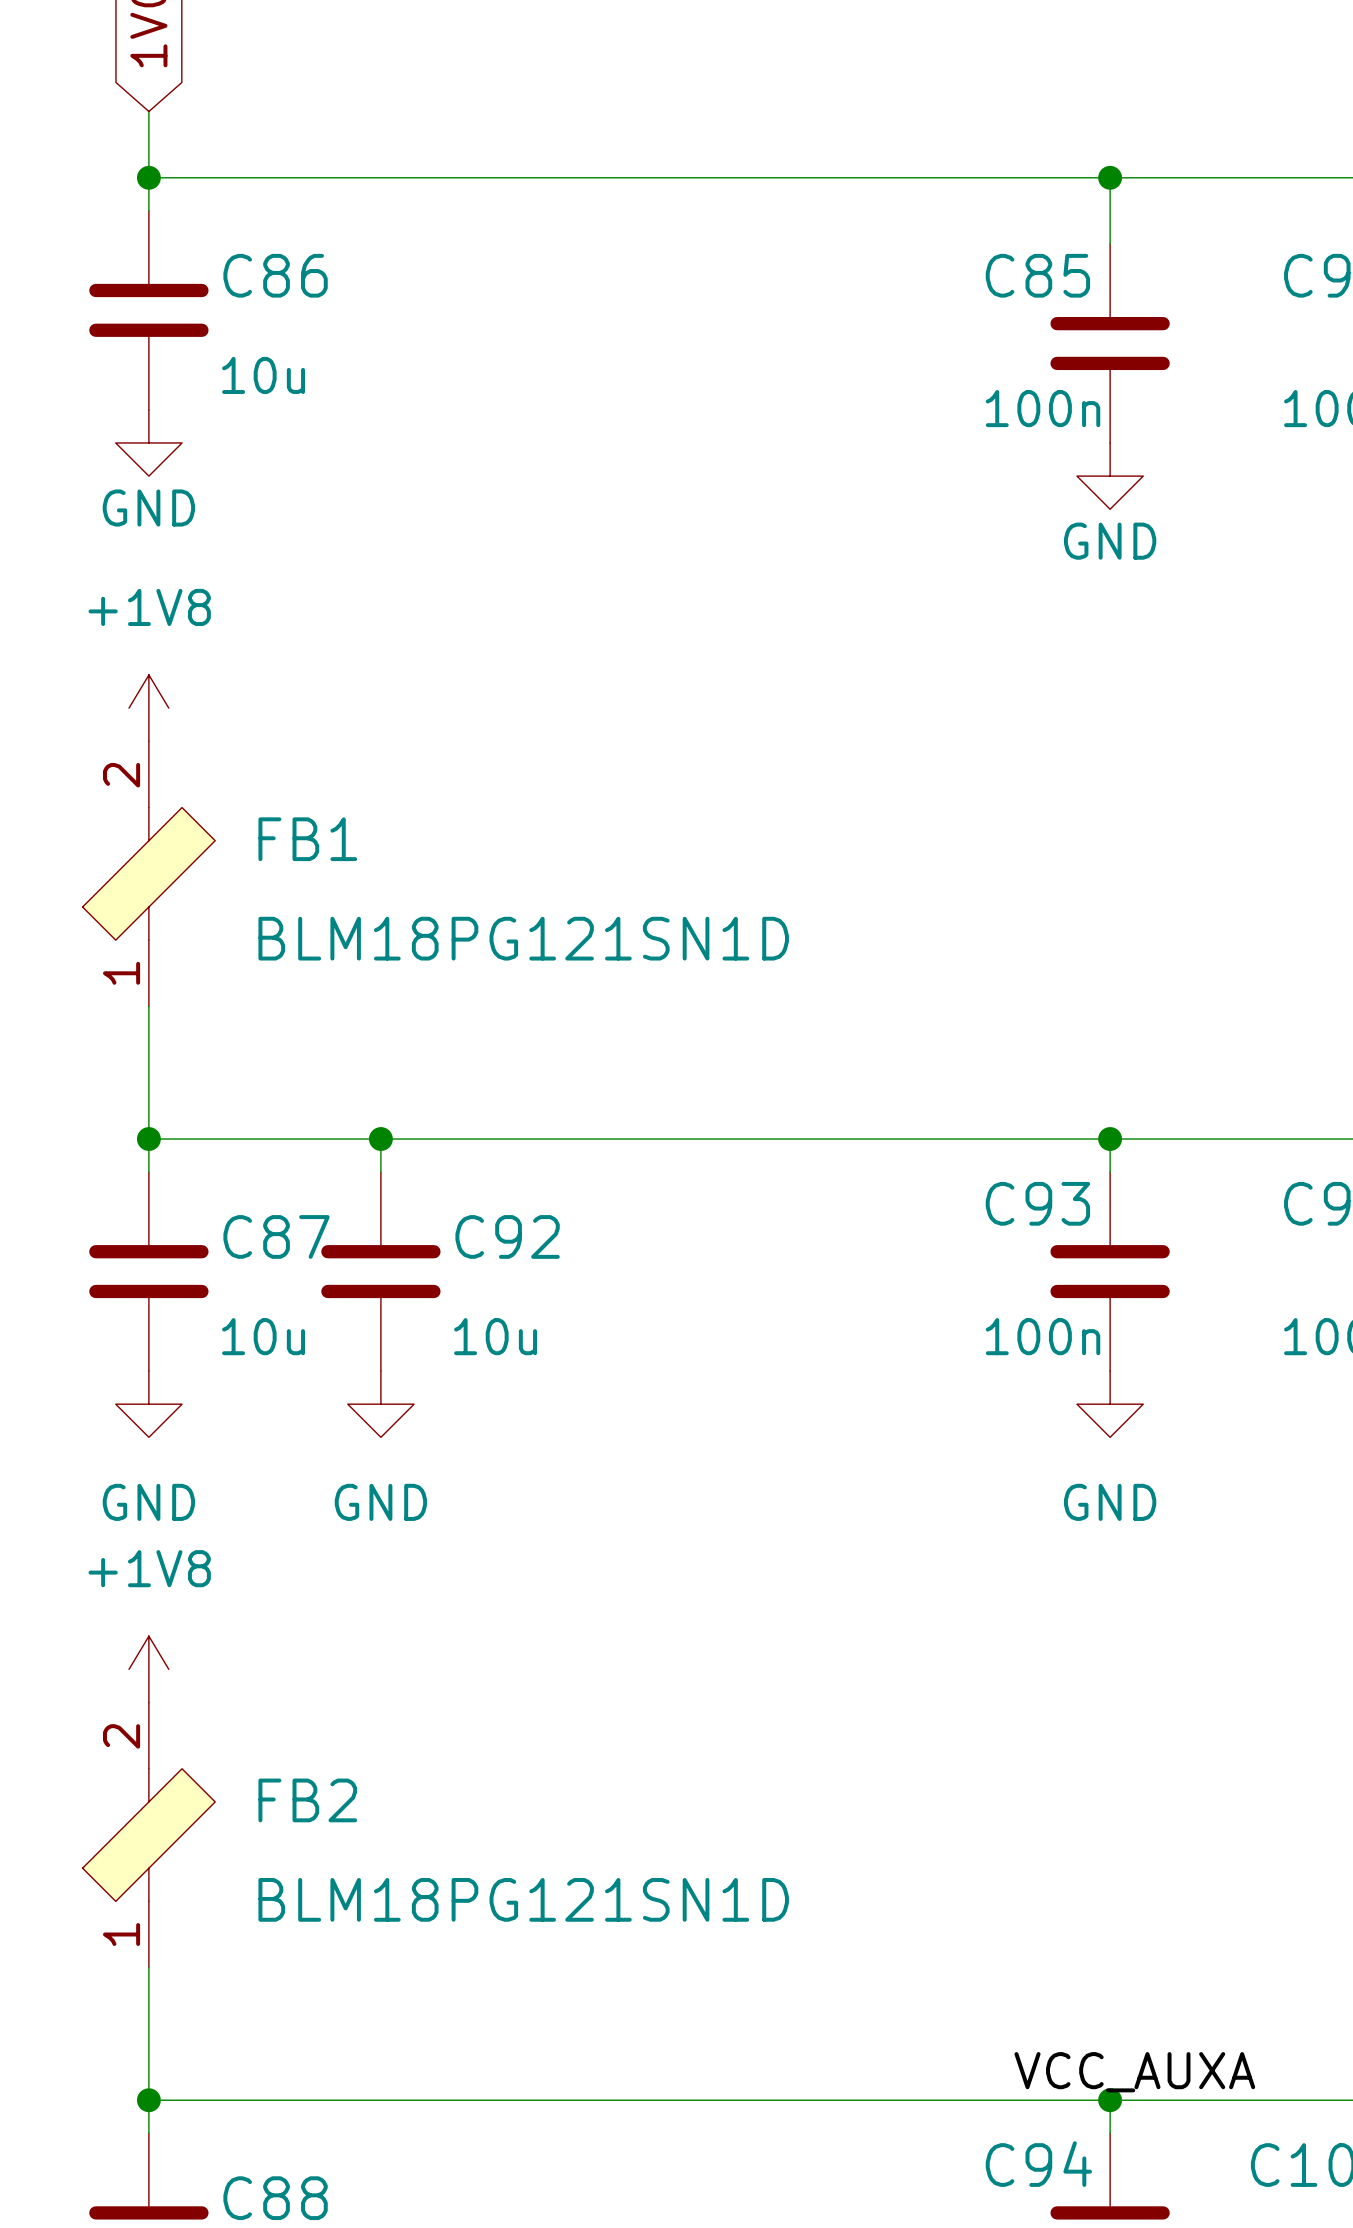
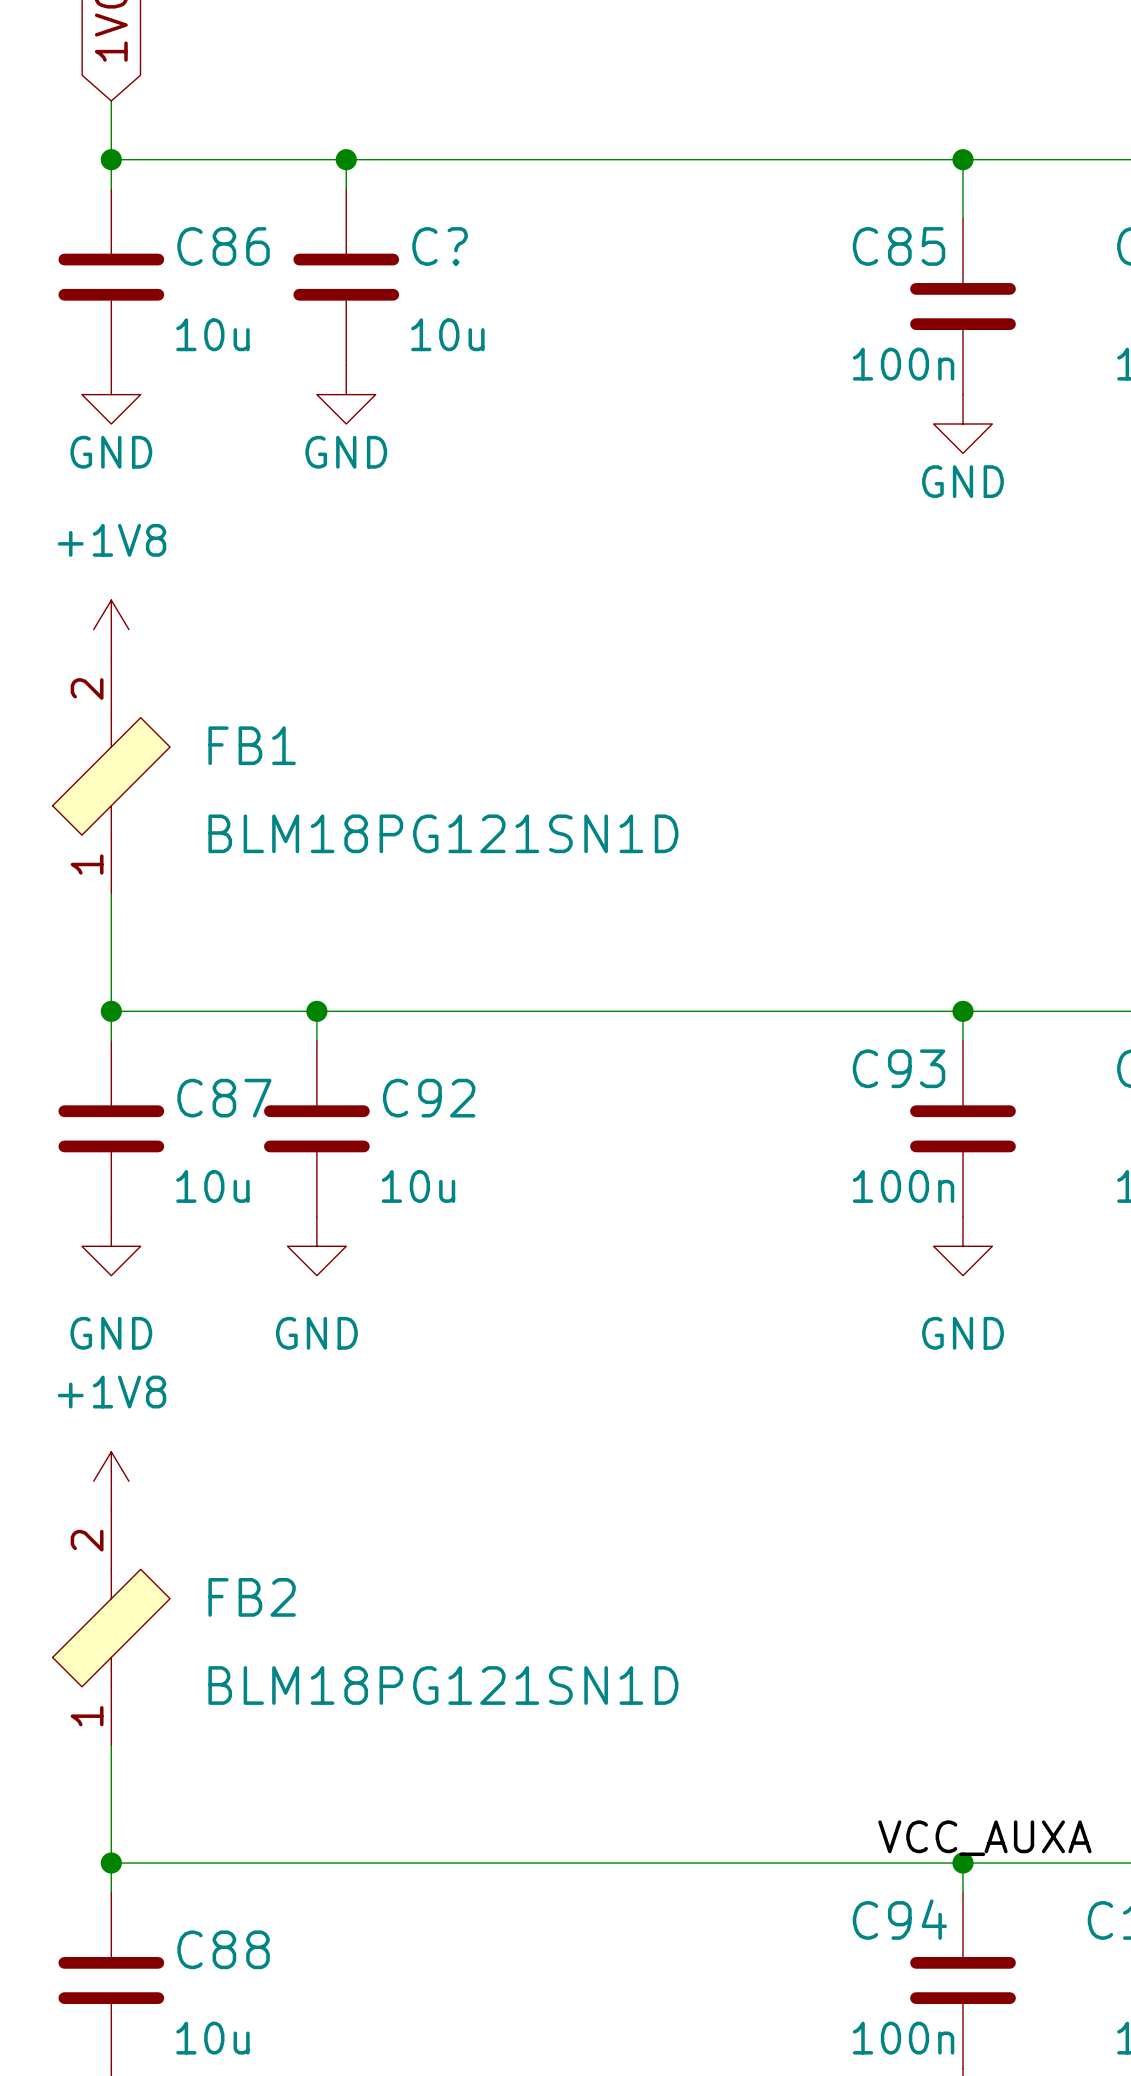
wire: none -> (346, 159) (346, 189)
junction: none -> (346, 159)
C?: none -> (346, 277)
power symbol: none -> GND (346, 394)

